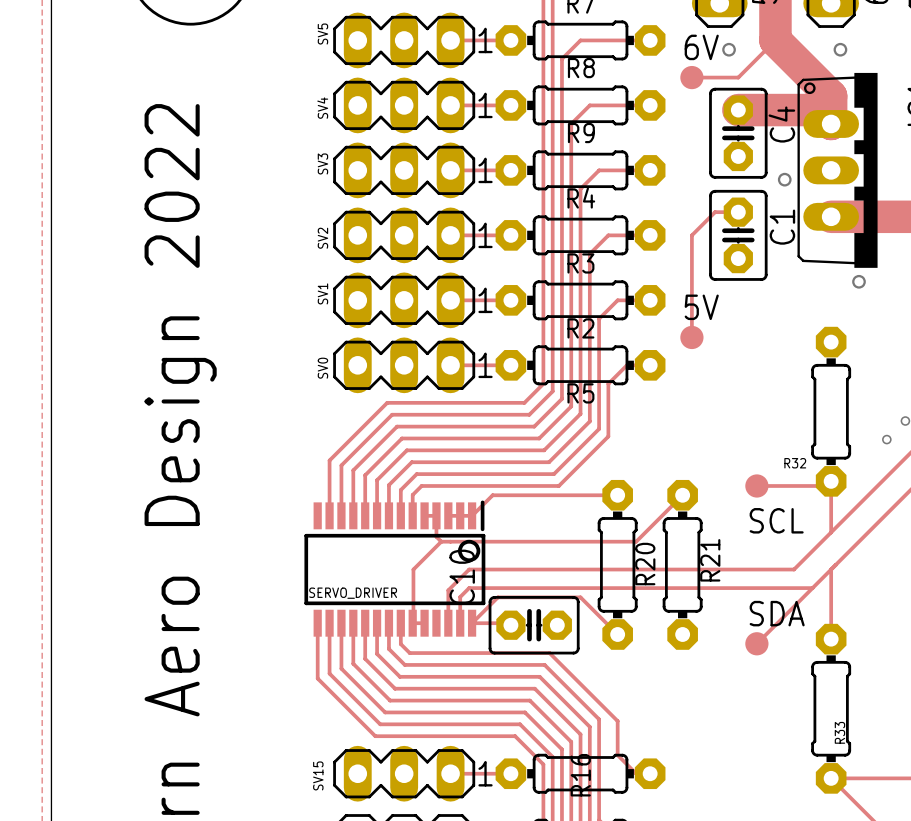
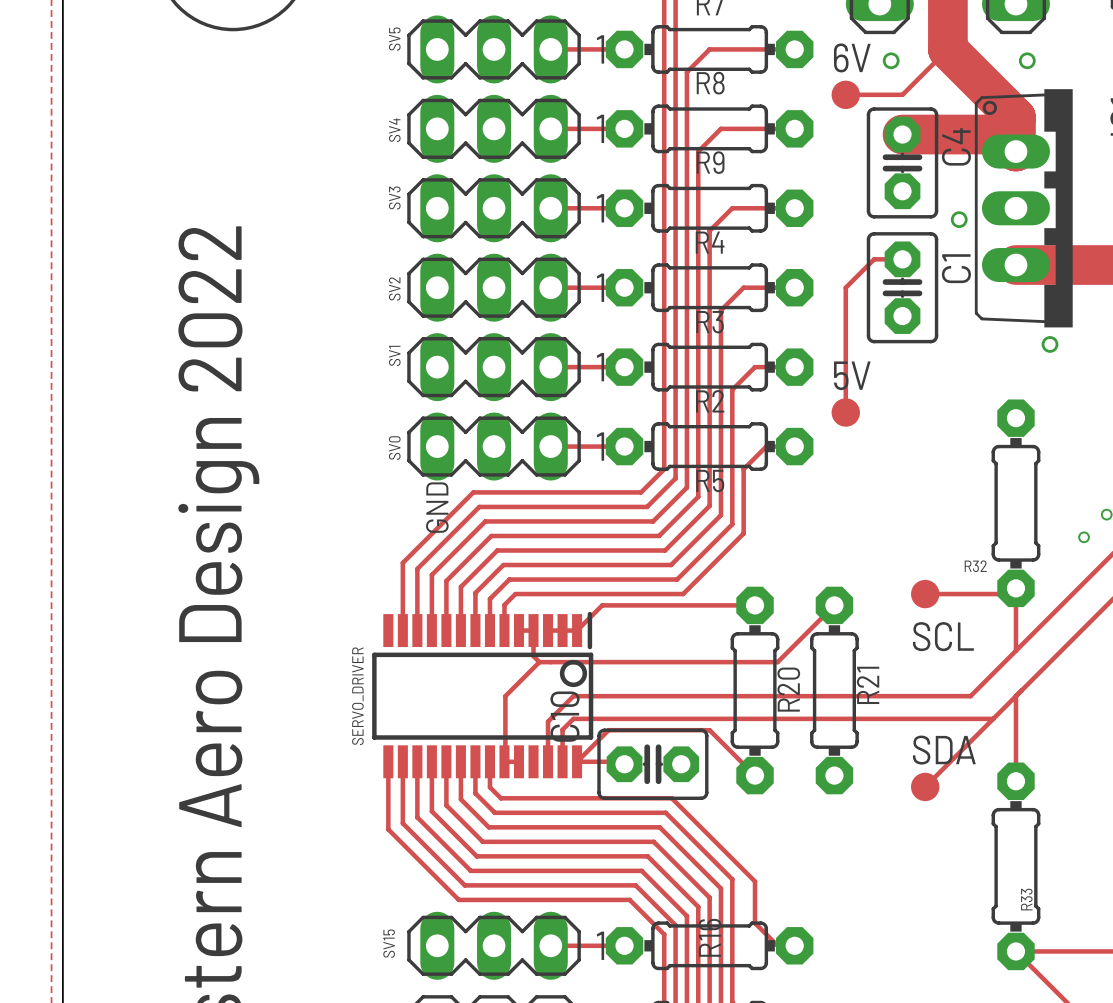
text: none -> GND (437, 507)
SERVO_DRIVER name rotation: 0° (353, 593) -> 90° counterclockwise (357, 696)

